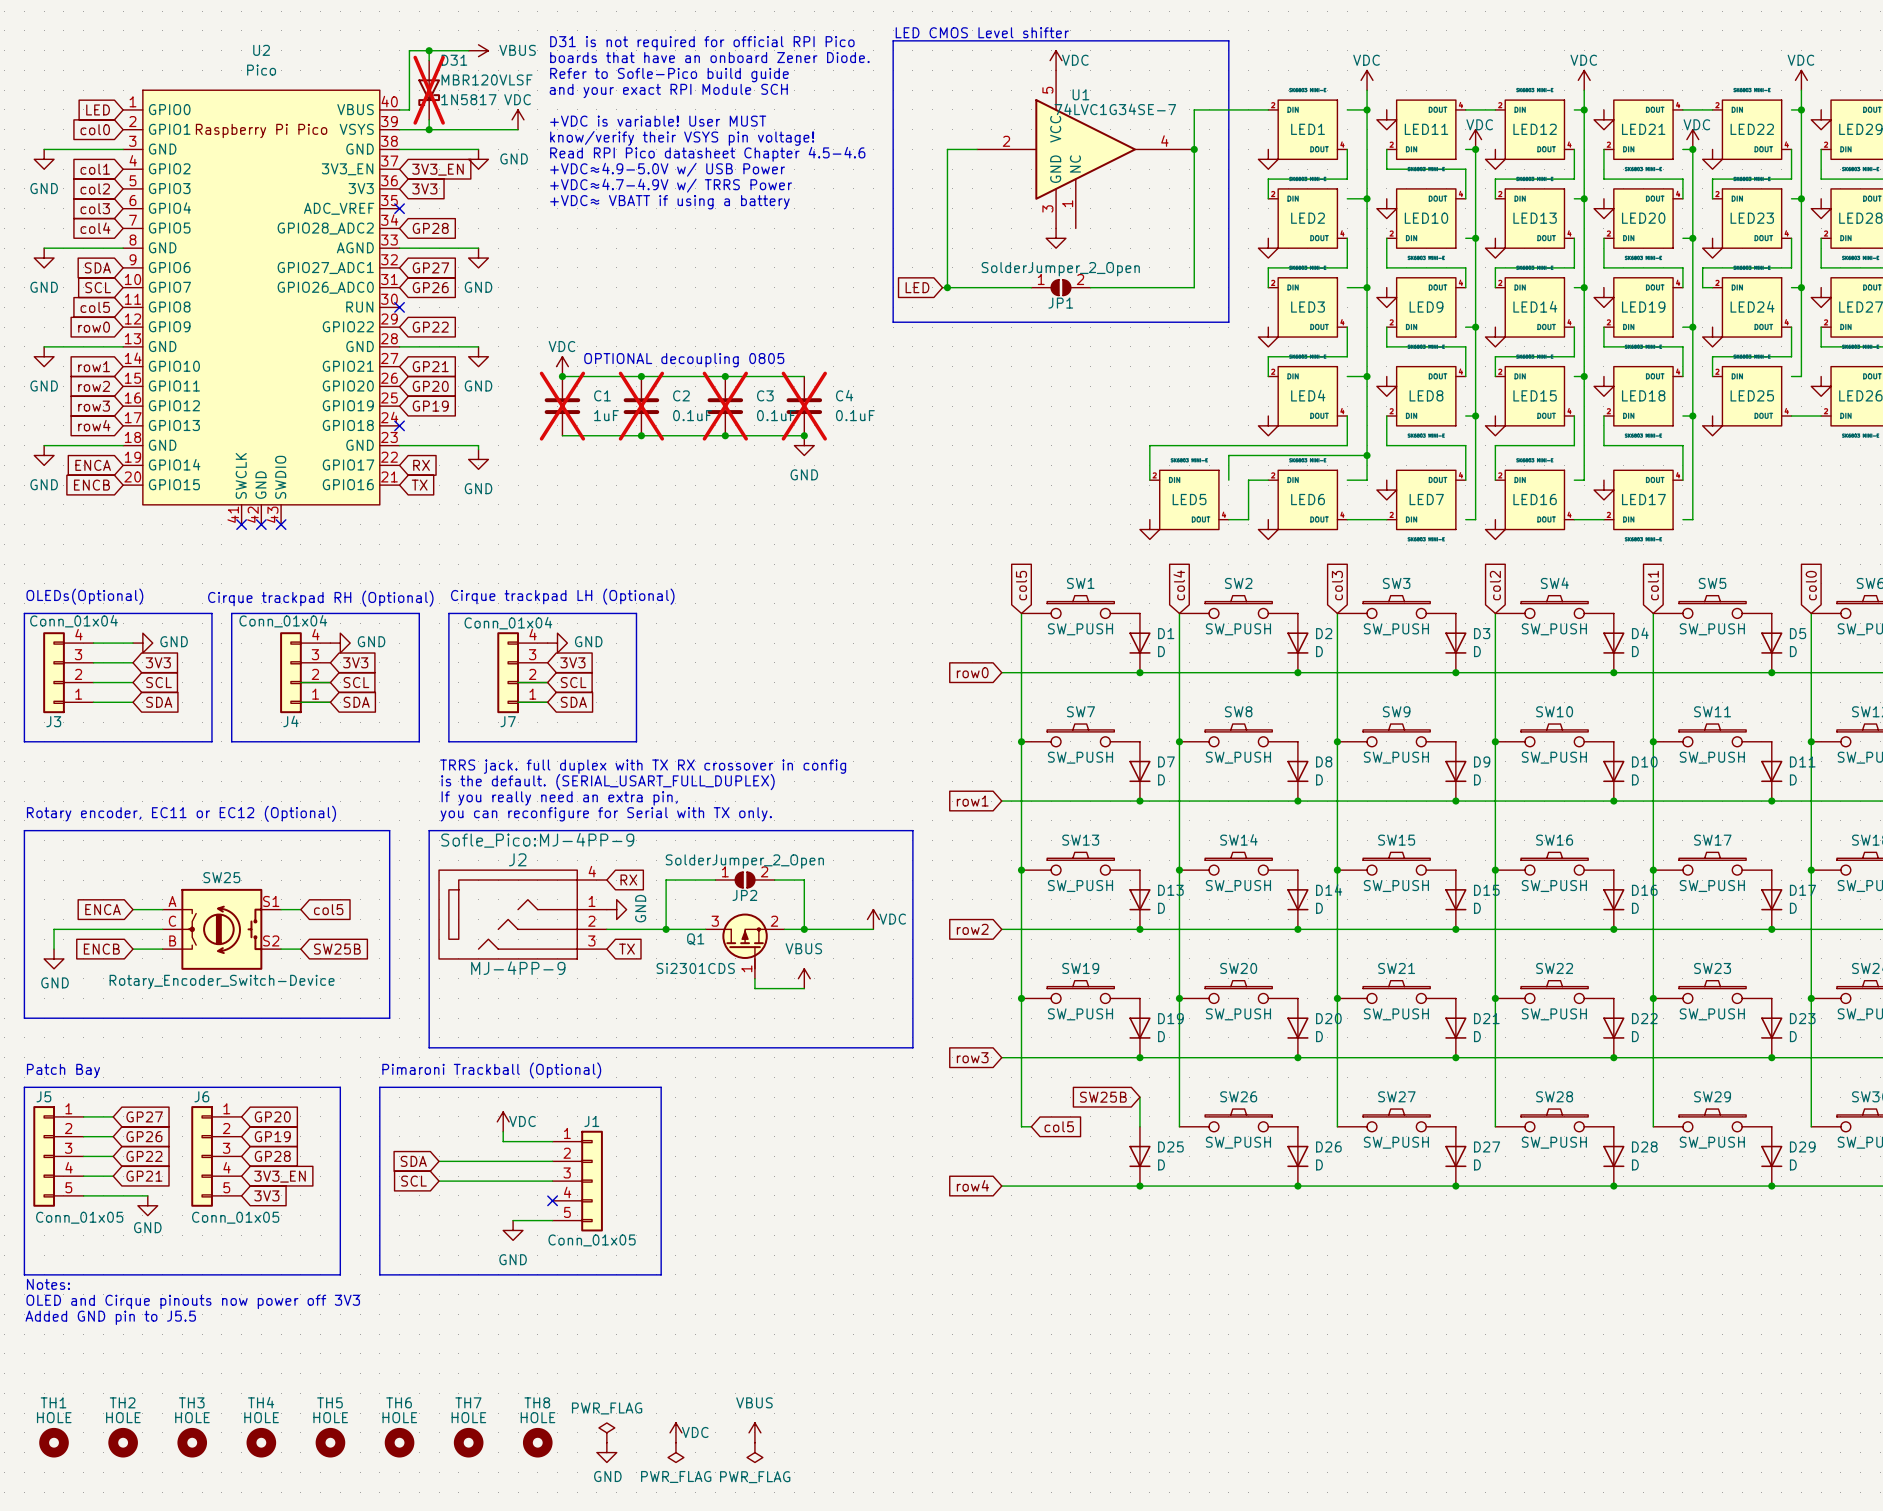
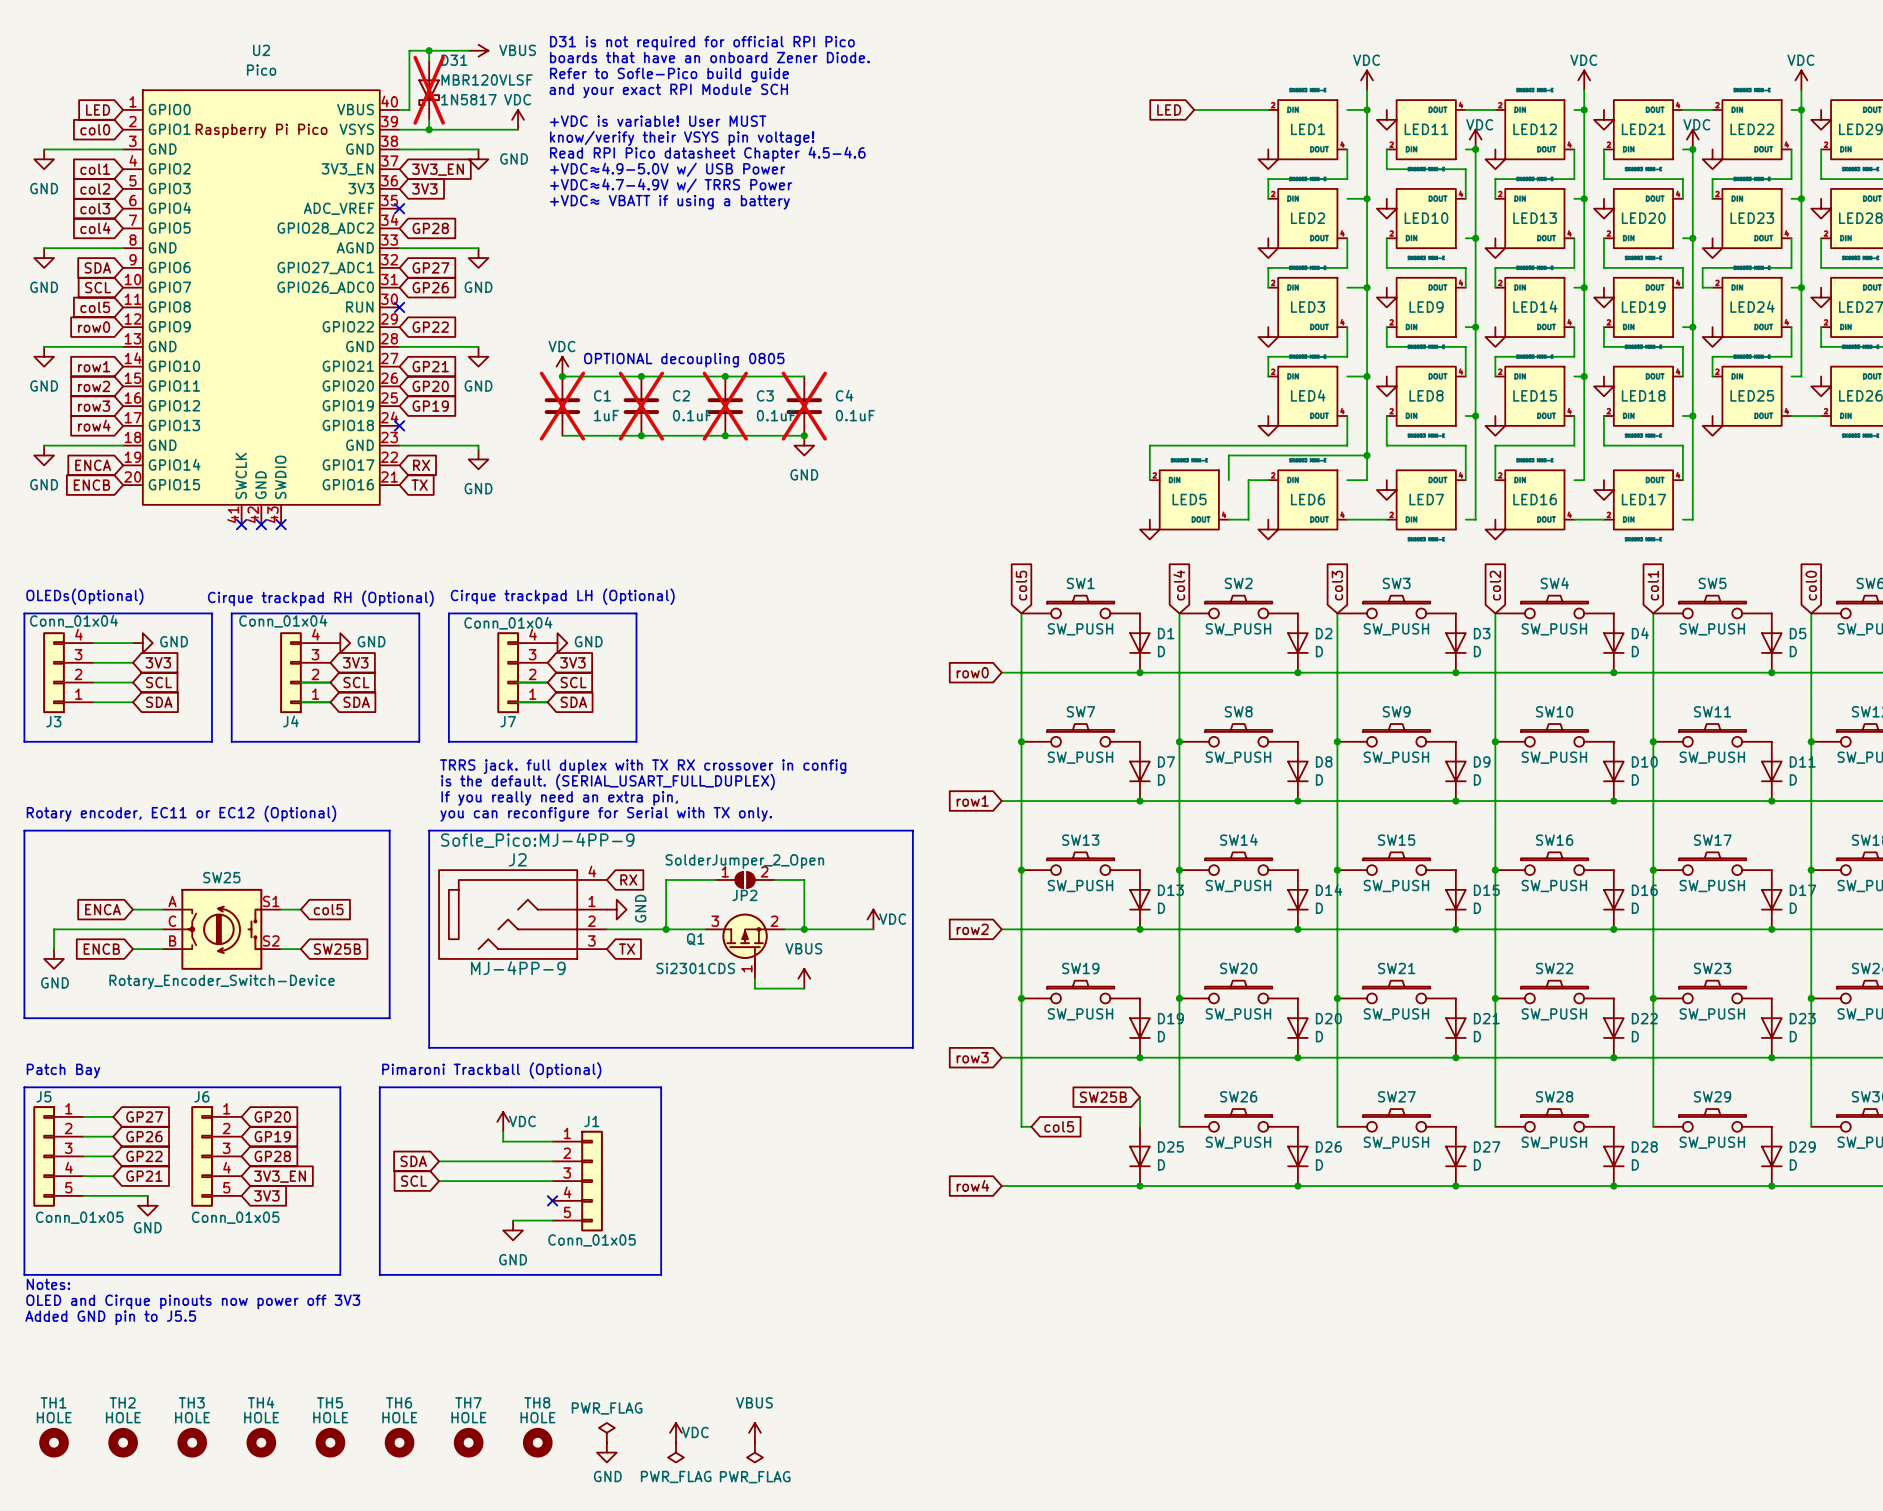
text: LED CMOS Level shifter (982, 32) -> none
line: (893, 40) (1228, 40) (1228, 322) (893, 322) (893, 40) -> none
power symbol: VDC (1056, 60) -> none
global label: none -> LED (1169, 109)
wire: (1194, 109) (1194, 287) (1090, 287) -> none
wire: (977, 149) (947, 149) (947, 287) -> none
U1: 74LVC1G34SE-7 (1085, 149) -> none
junction: (1194, 149) -> none
power symbol: (1056, 238) -> none
global label: LED (917, 287) -> none
wire: (942, 287) (1031, 287) -> none
junction: (947, 287) -> none
JP1: SolderJumper_2_Open (1060, 287) -> none

